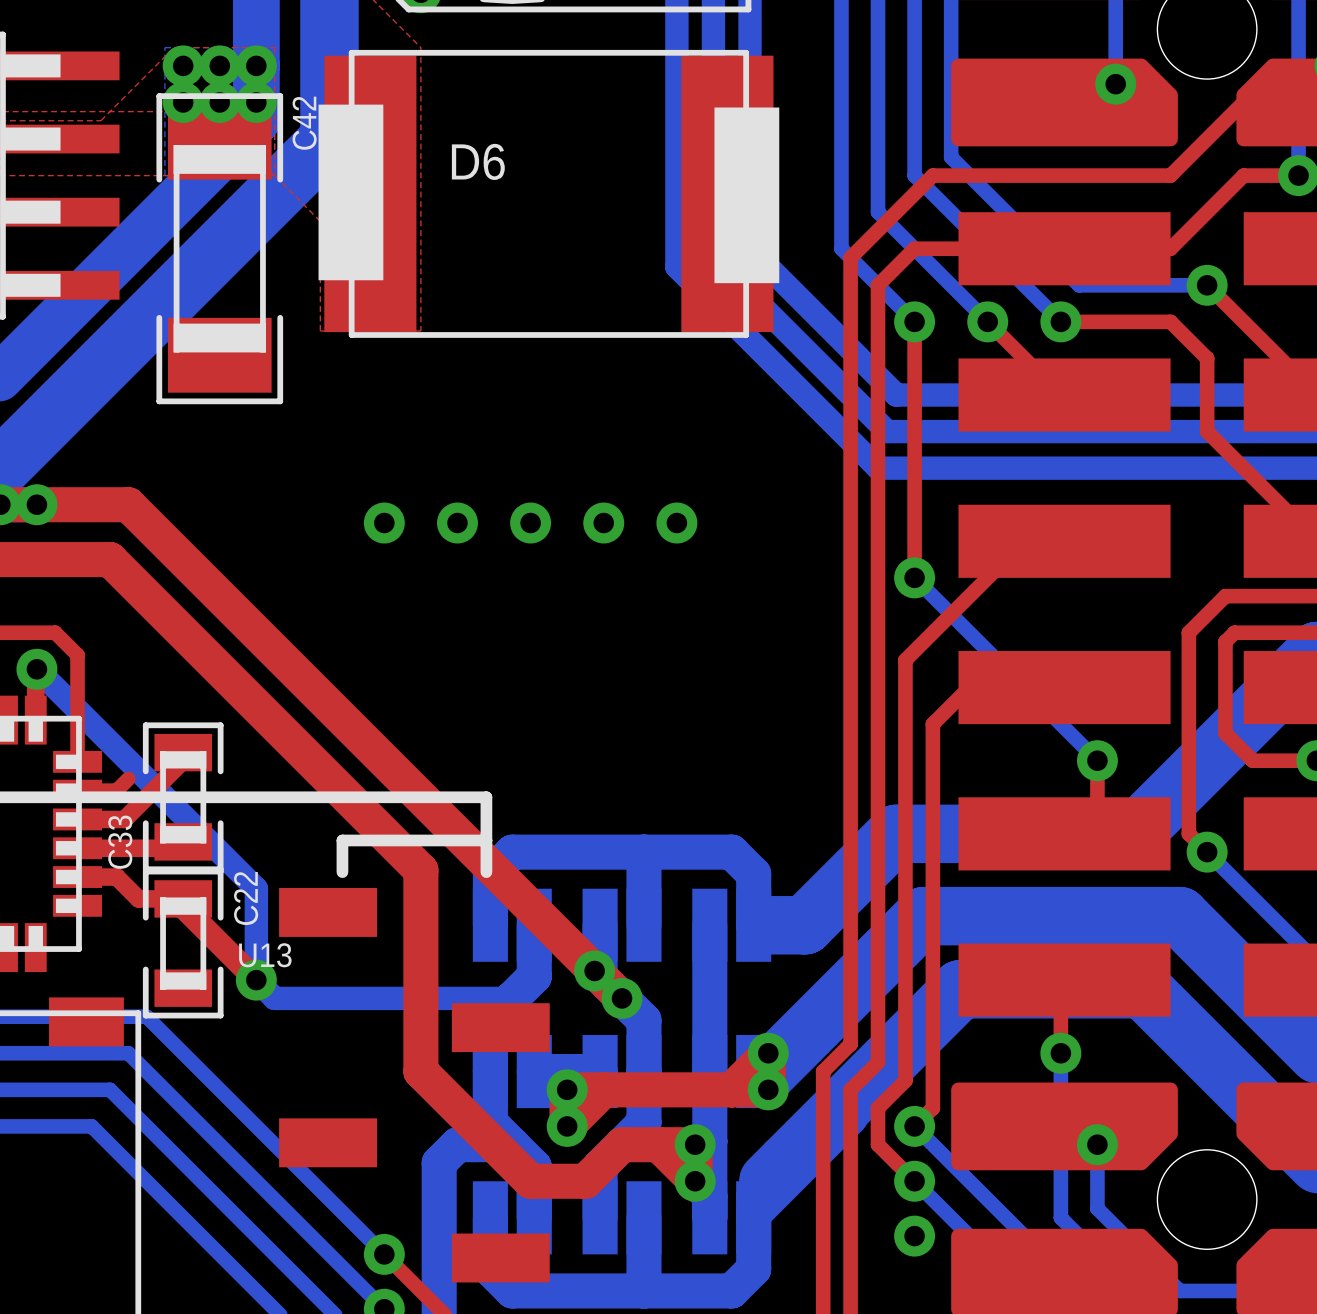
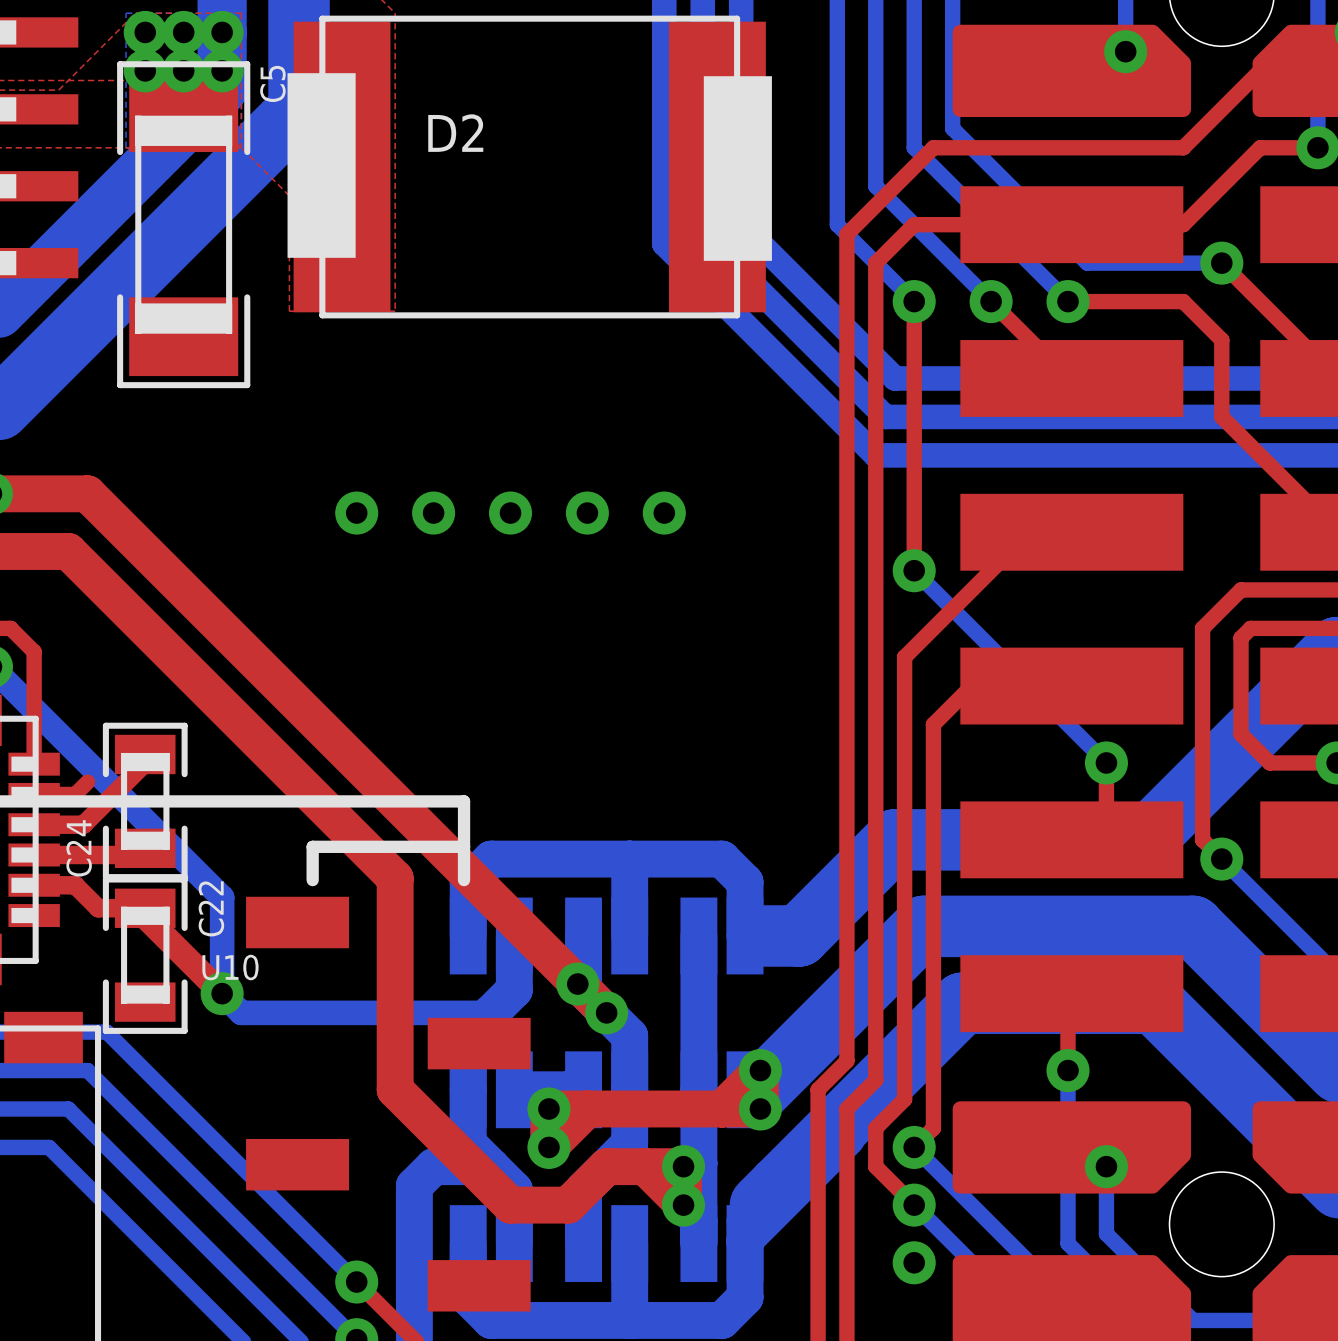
C42 name: C42 (304, 123) -> C5 (272, 83)
D6 name: D6 (478, 161) -> D2 (455, 133)
C33 name: C33 (120, 842) -> C24 (79, 848)
U13 name: U13 (265, 955) -> U10 (230, 967)

